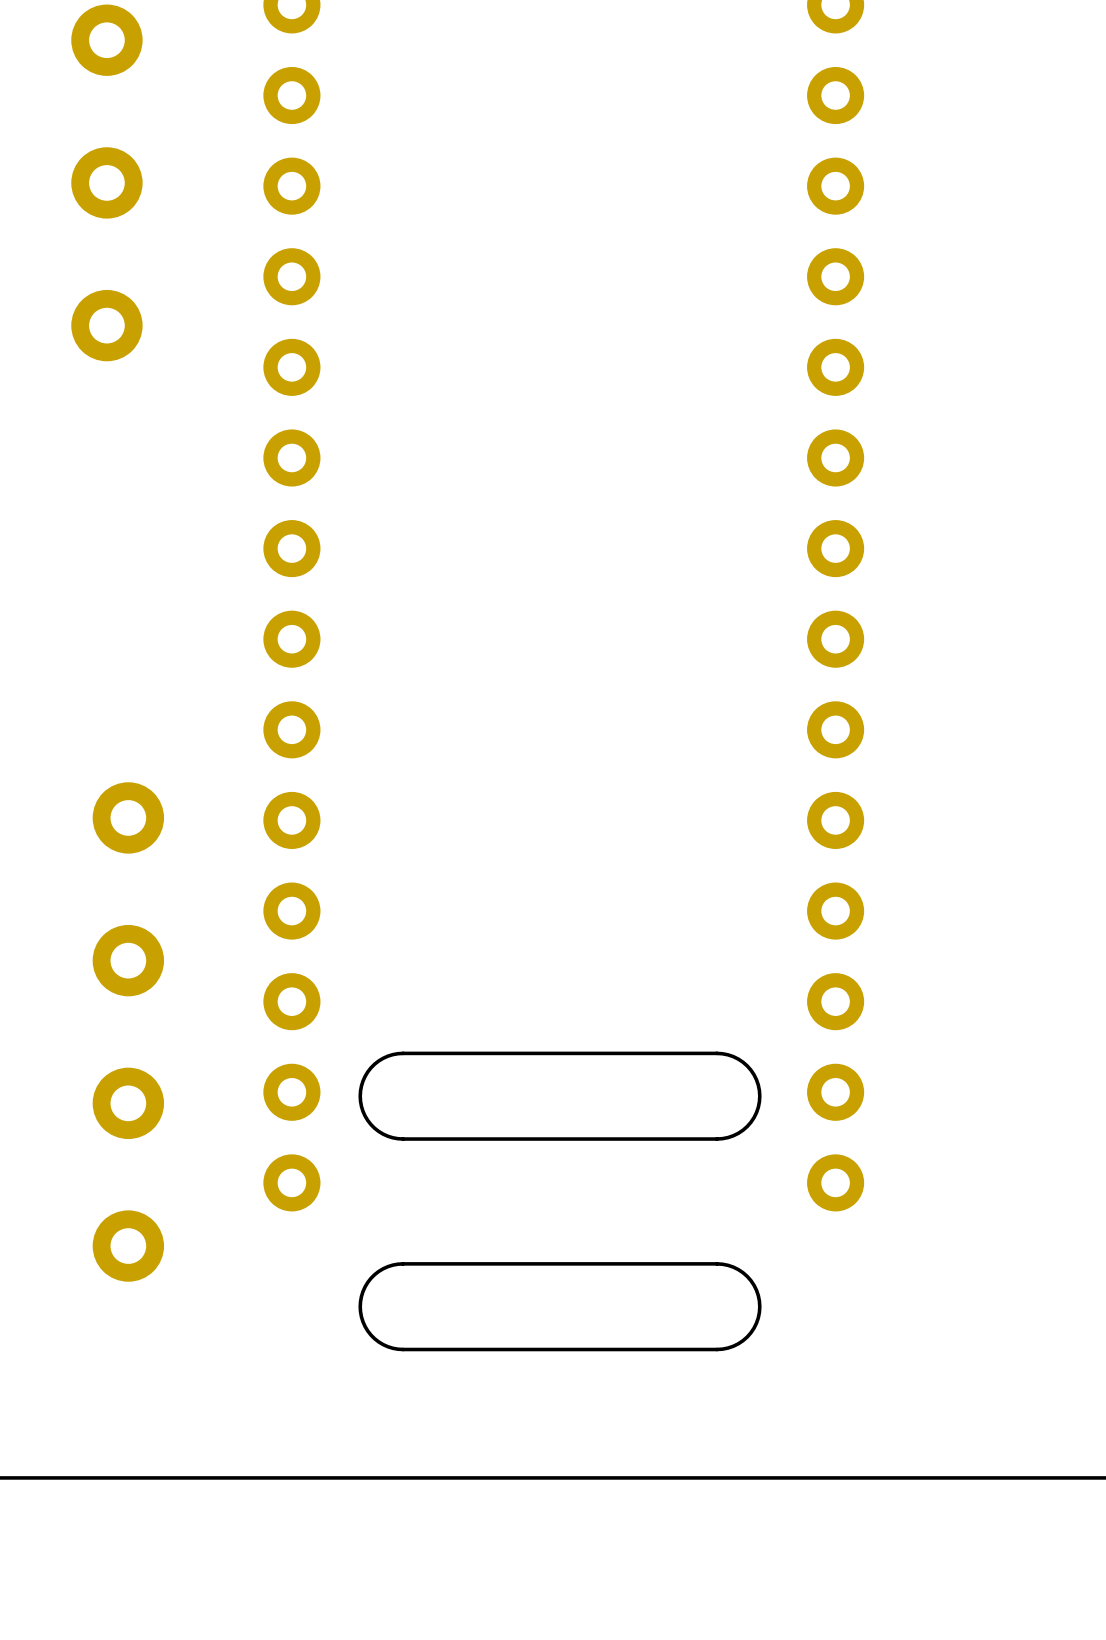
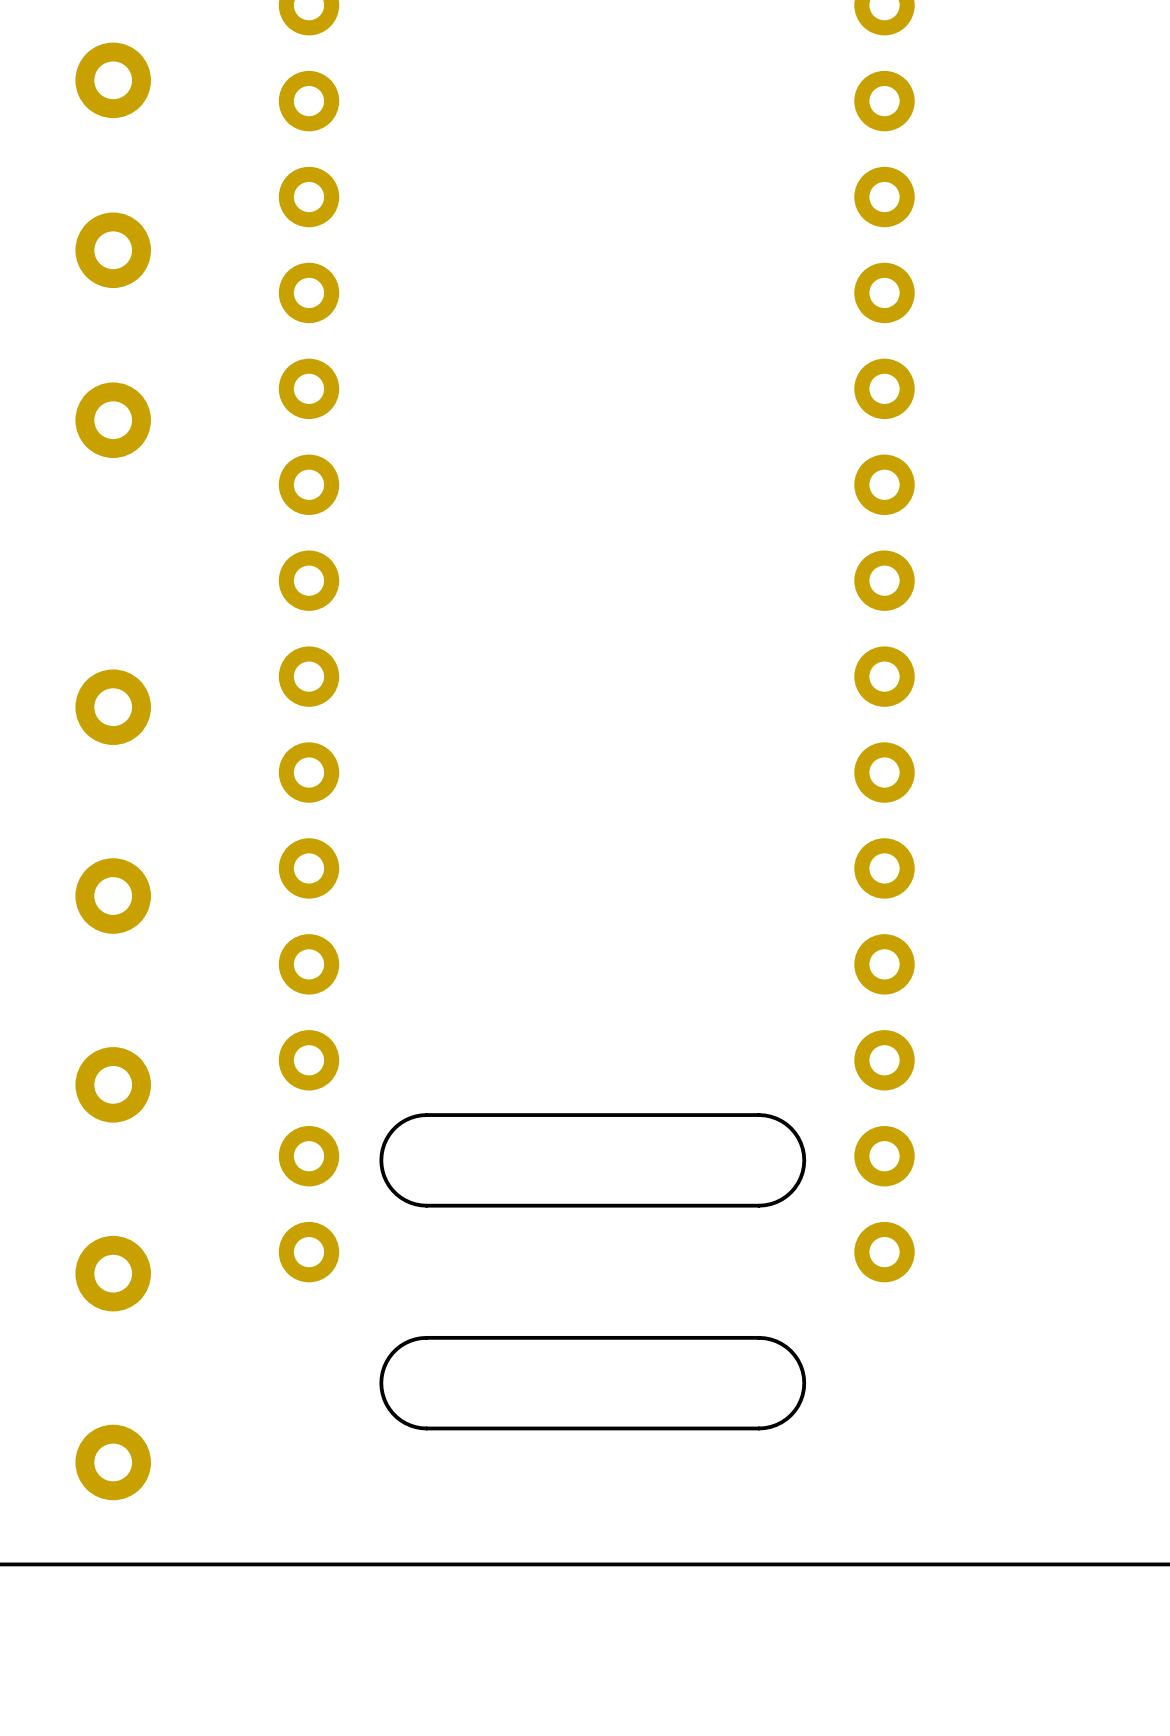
part position: (106, 40) -> (113, 80)
part: (106, 182) -> none
part: none -> (113, 250)
part: (106, 325) -> none
part: none -> (113, 420)
part: none -> (113, 707)
part position: (128, 817) -> (113, 896)
part: (128, 960) -> none
part: none -> (113, 1084)
part: (128, 1103) -> none
part position: (128, 1246) -> (113, 1273)
part: none -> (113, 1462)

